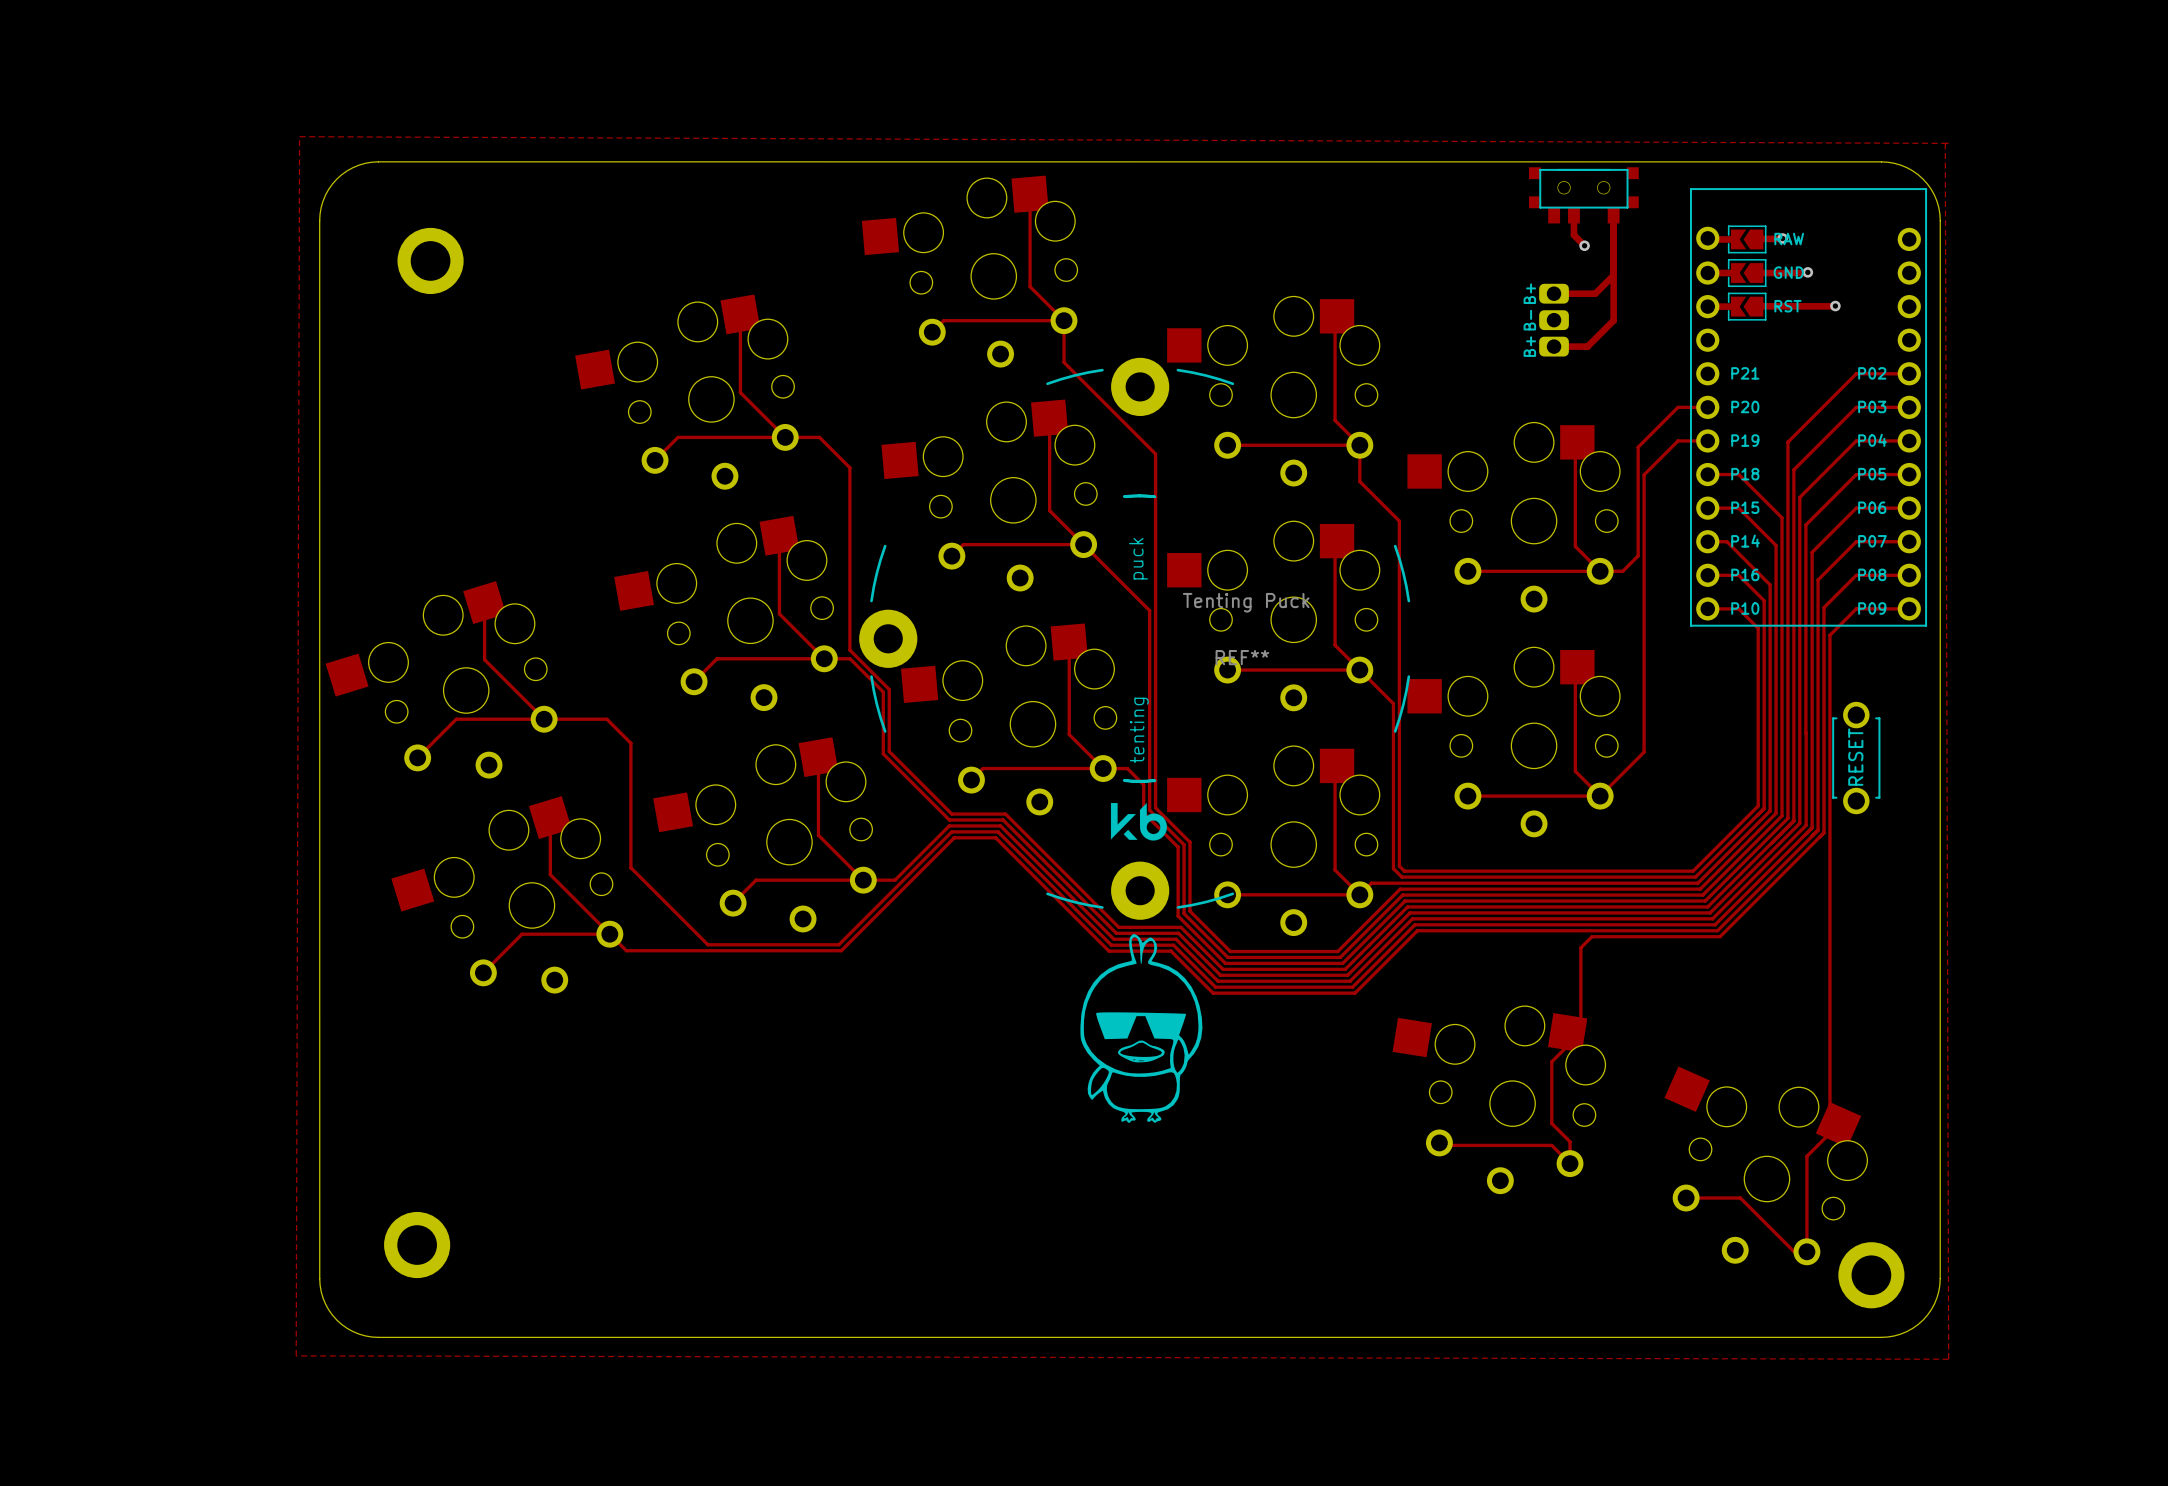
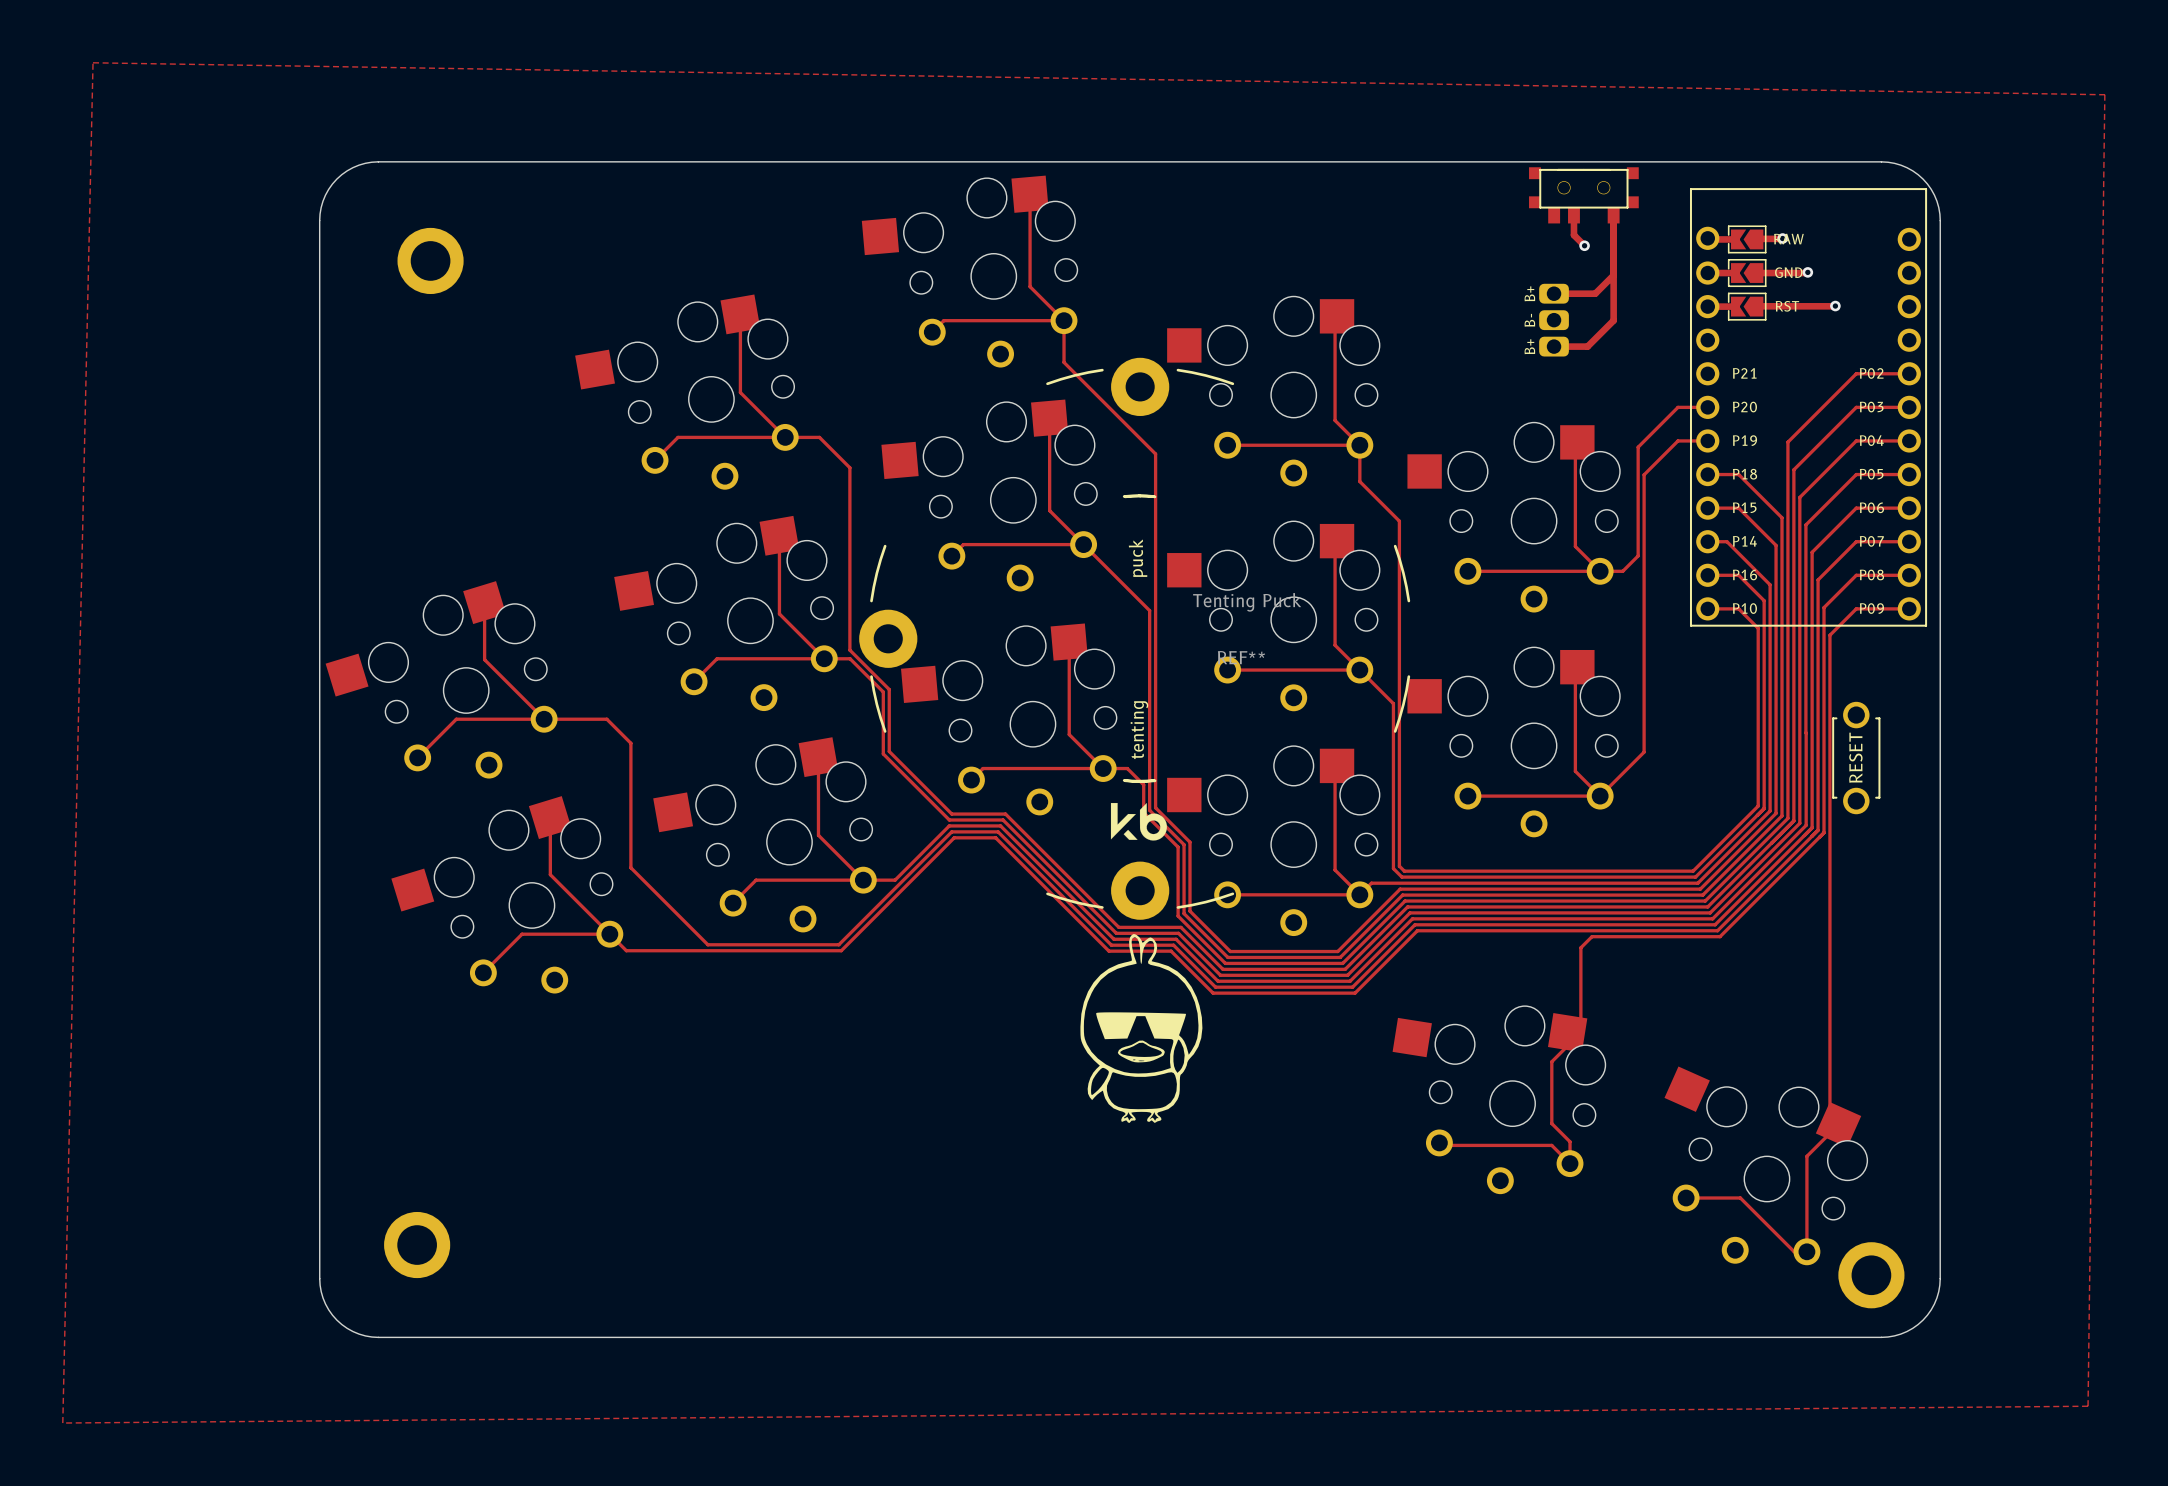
zone outline: (299, 136) (296, 1355) (1948, 1359) (1945, 143) (1948, 143) (299, 136) -> (93, 62) (62, 1423) (2088, 1406) (2104, 94) (93, 62)

